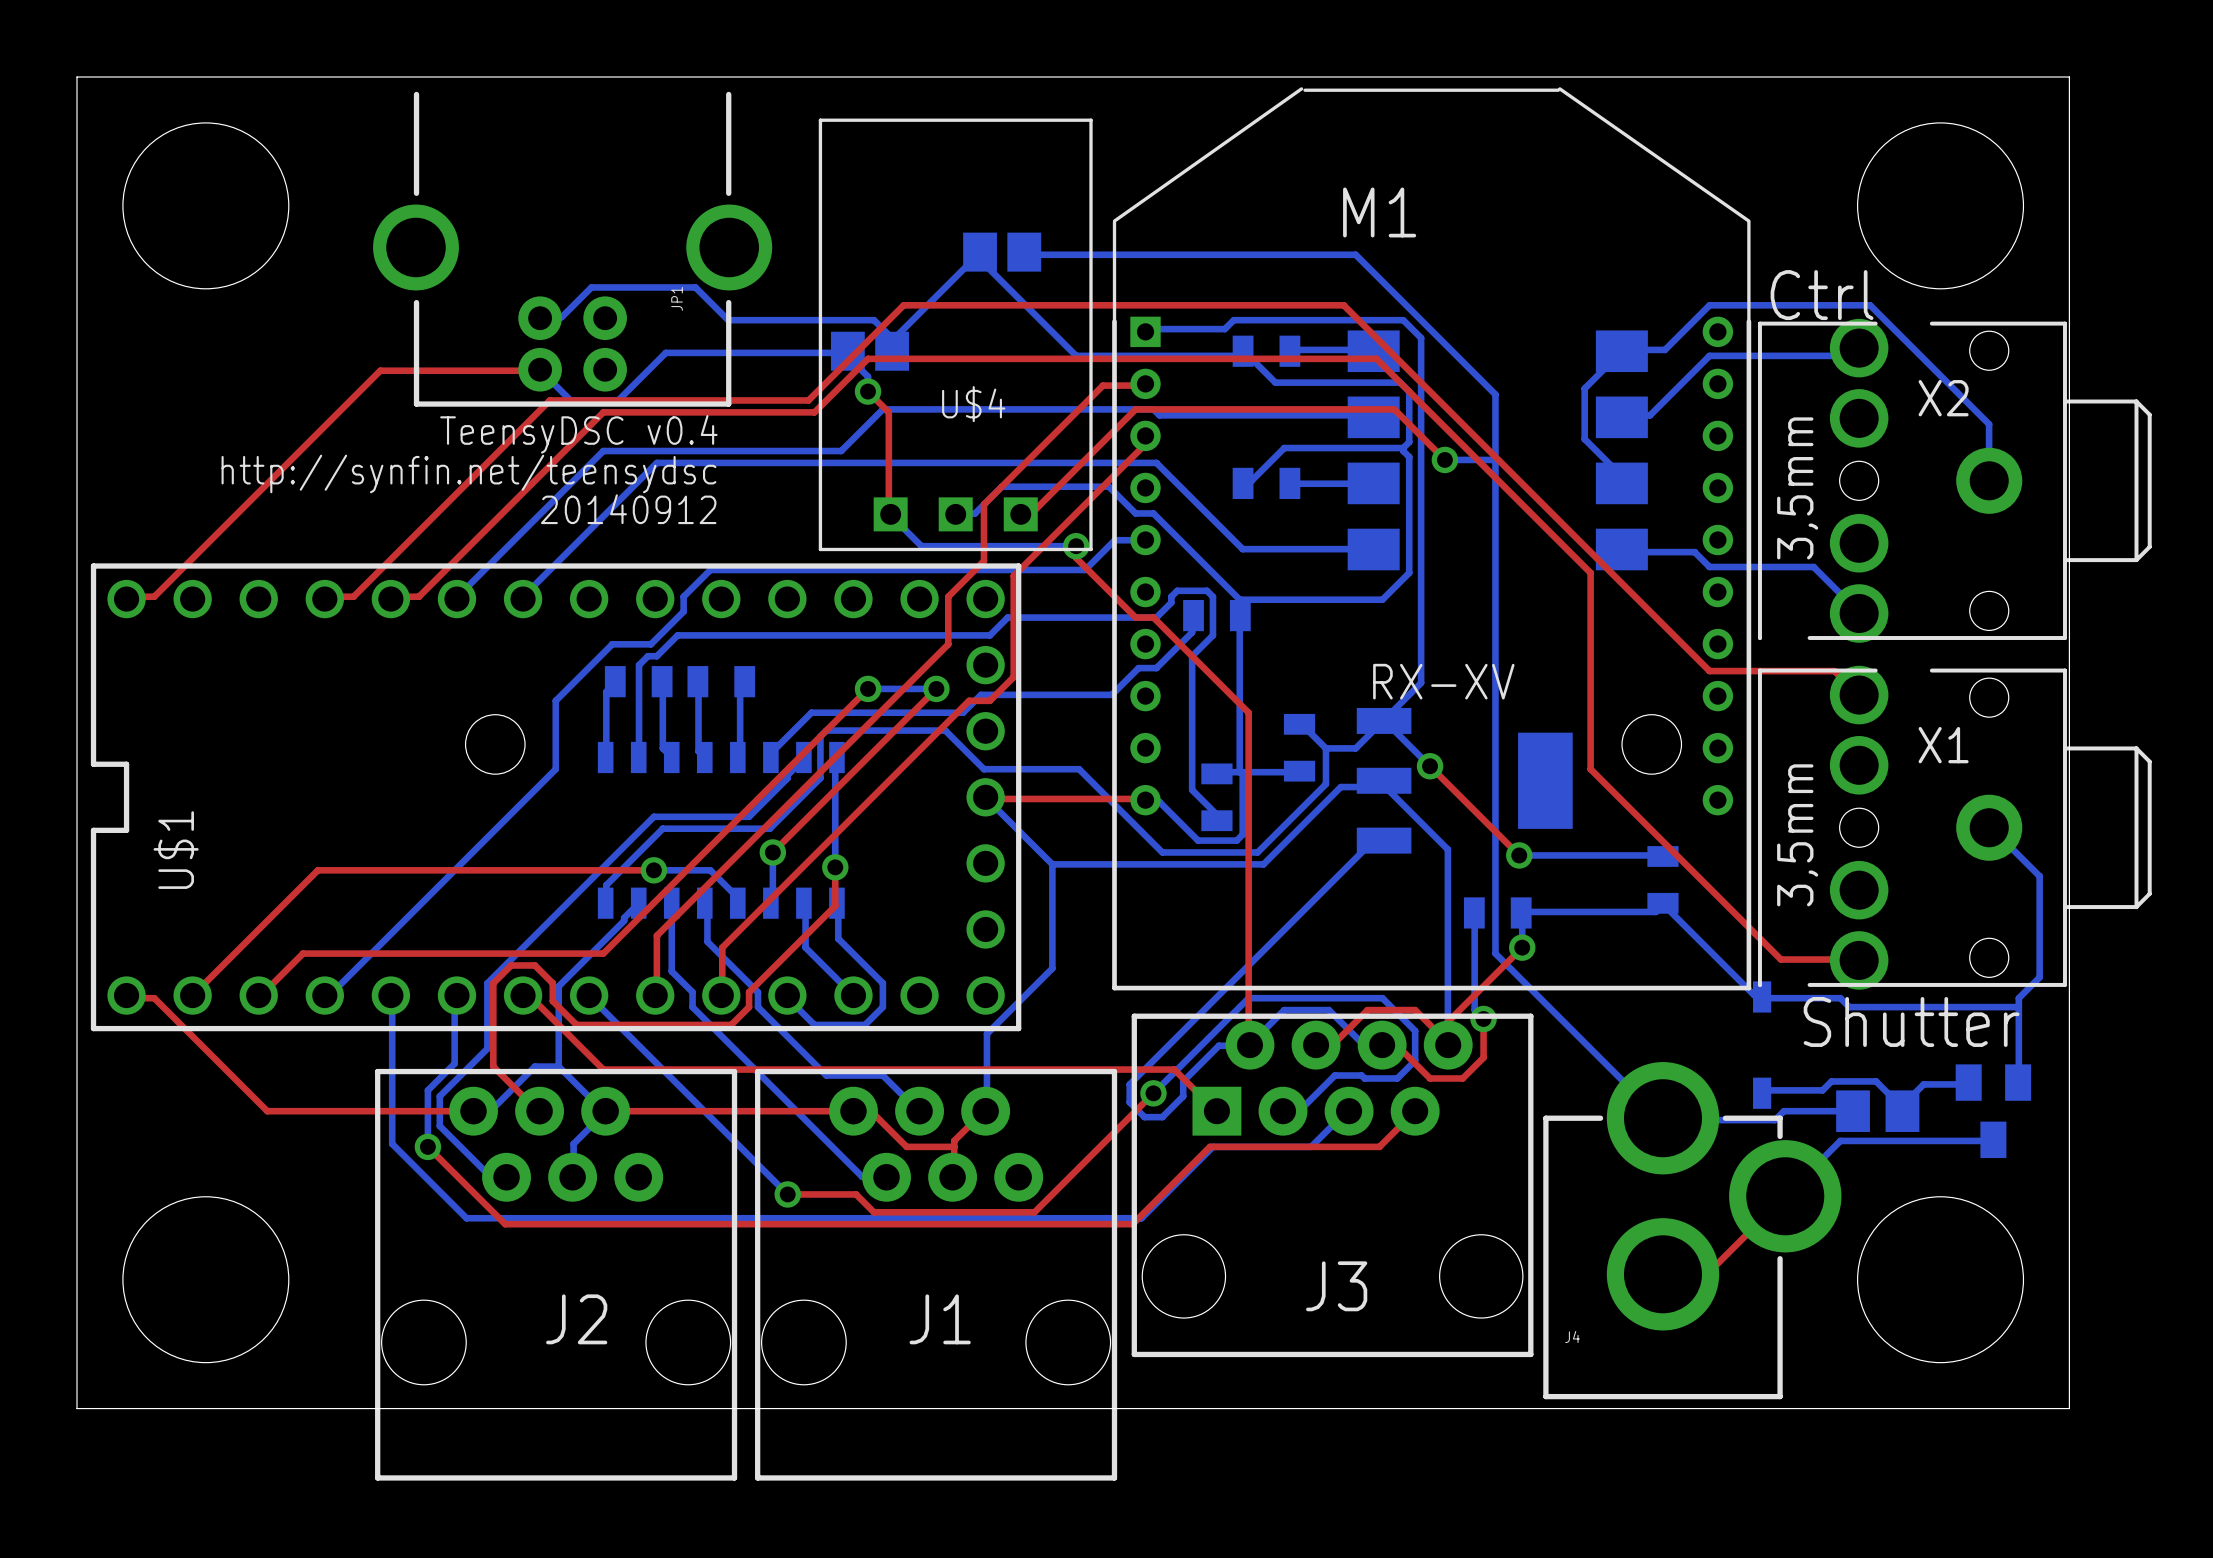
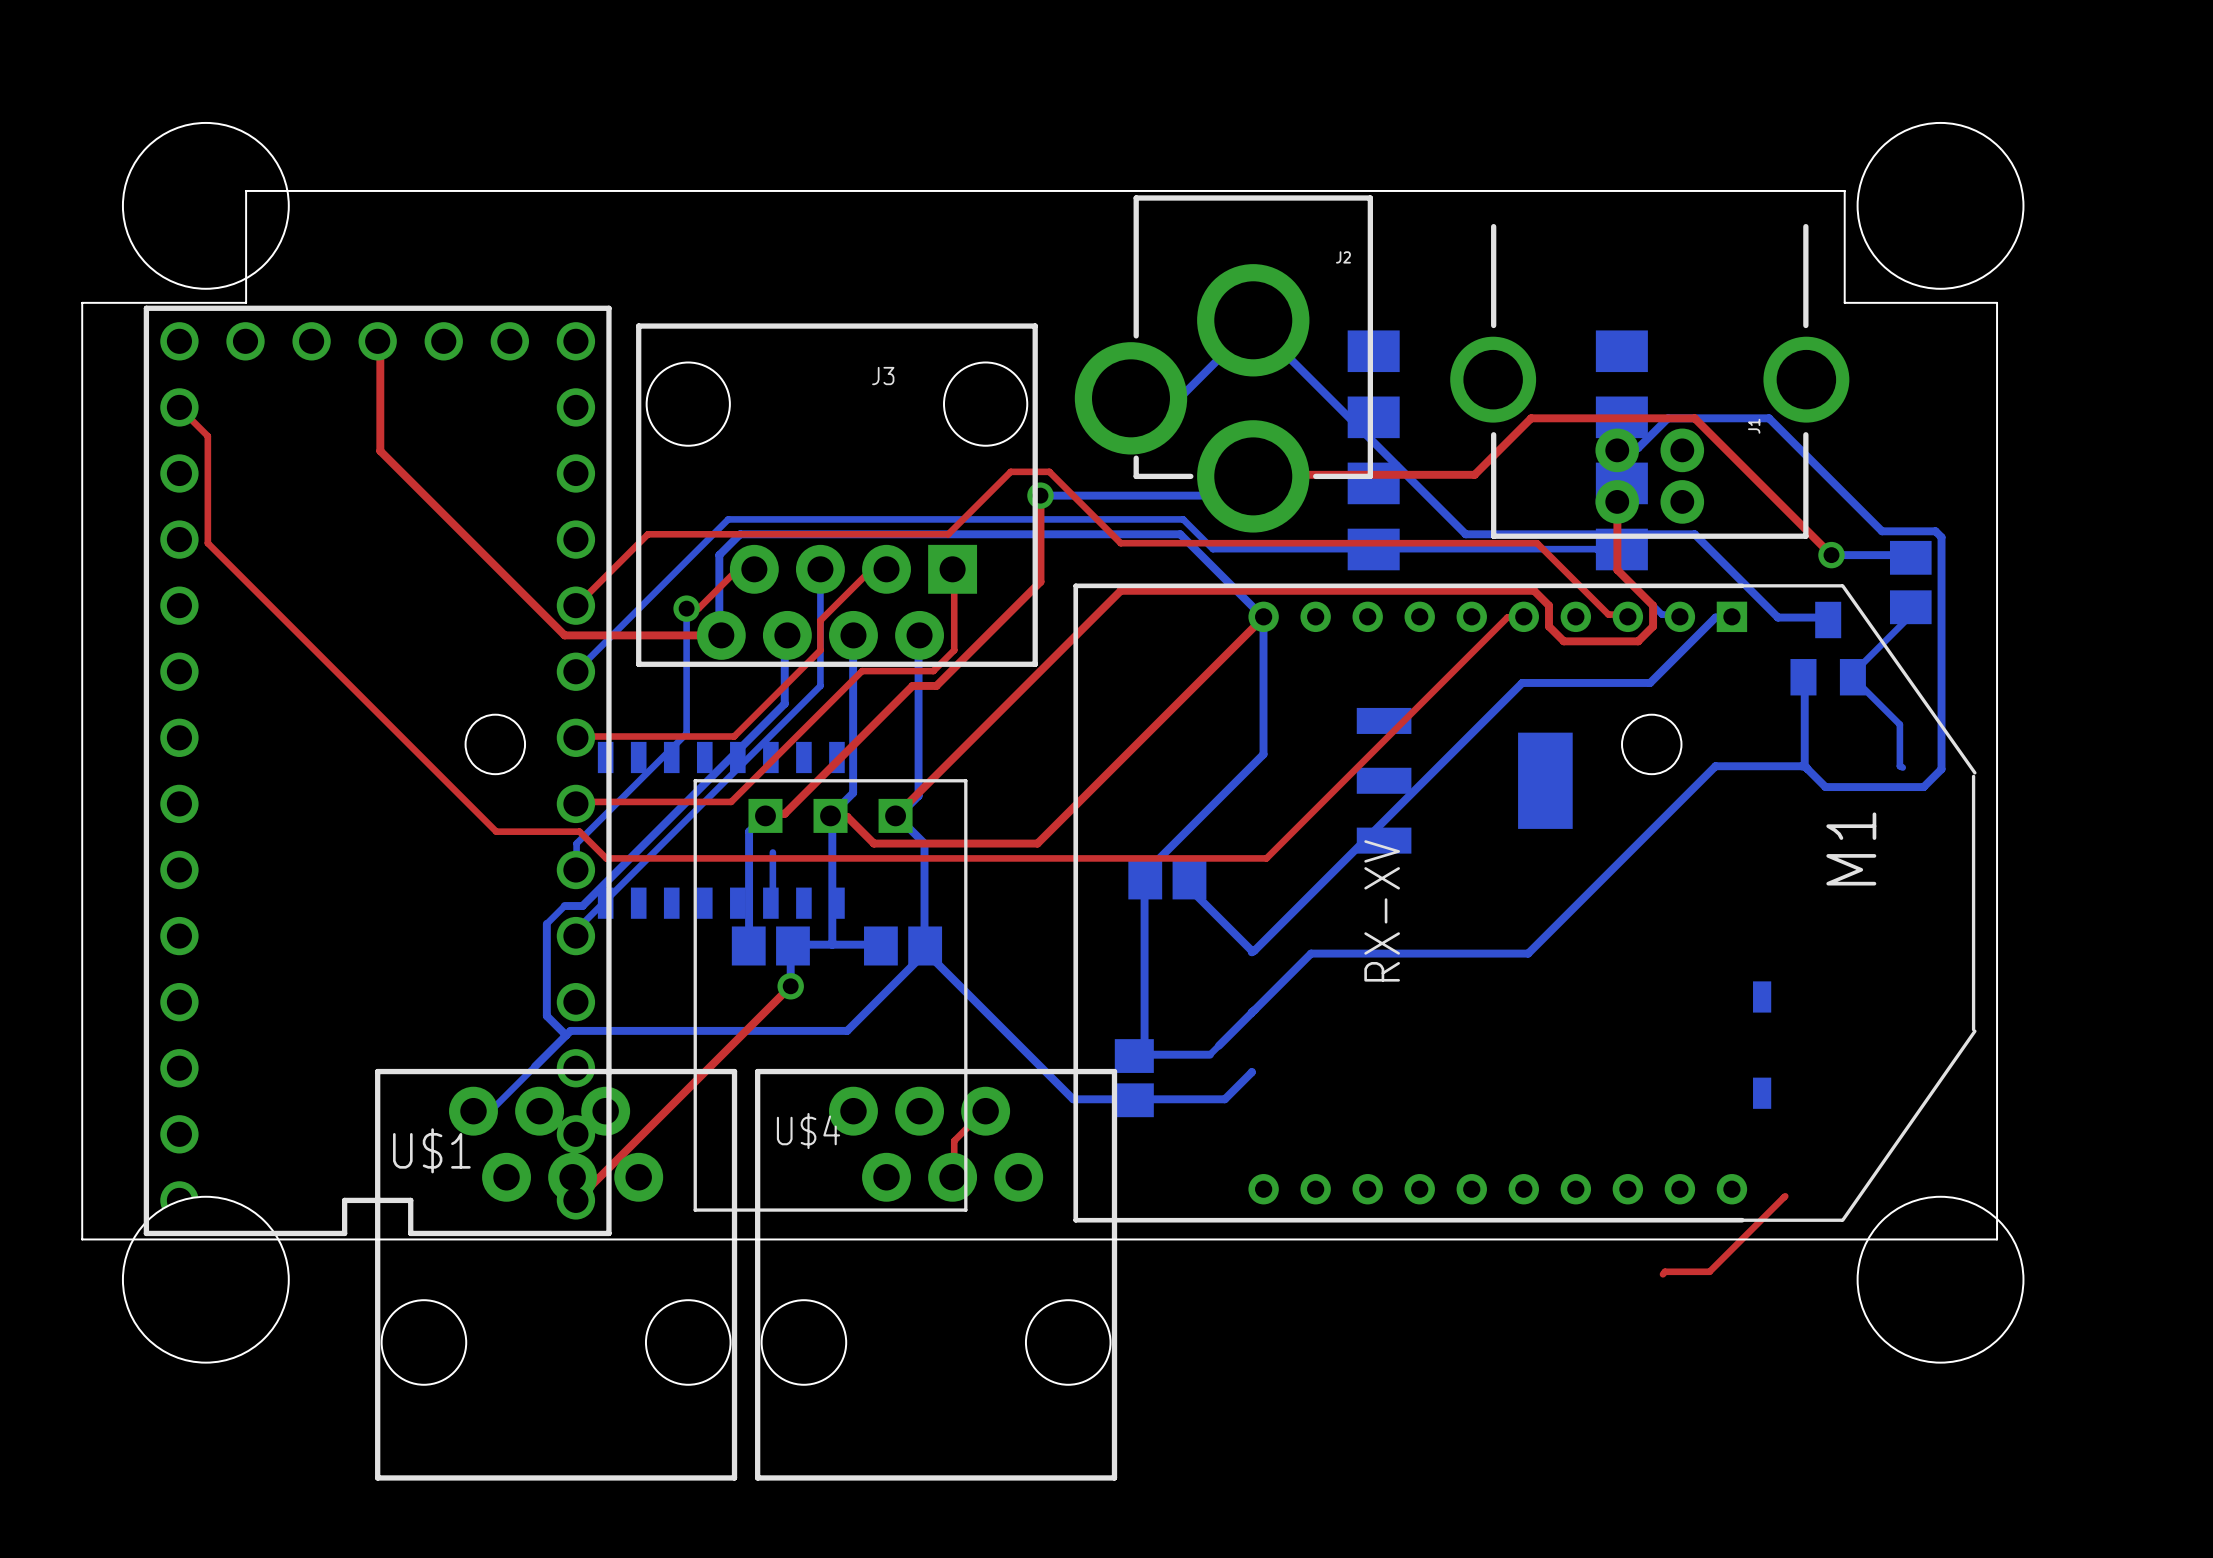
board edge: (77, 77) (2069, 77) (2069, 1408) (77, 1408) (77, 77) -> (246, 190) (246, 302) (82, 302) (82, 1239) (1997, 1239) (1997, 302) (1844, 302) (1844, 190) (246, 190)
M1 footprint: [1112, 87, 1752, 991] -> [1073, 583, 1977, 1223]
M1 name position: M1 (1379, 212) -> M1 (1851, 848)
JP1: (572, 249) -> none
part: (1002, 252) -> none
bottom track: (1024, 252) (1025, 254) (1355, 254) (1495, 394) (1495, 953) (1661, 1120) (1662, 1118) (1664, 1120) (1774, 1120) (1783, 1111) (1853, 1111) -> none
text: Ctrl (1822, 295) -> none
bottom track: (540, 318) (561, 317) (591, 287) (695, 287) (728, 320) (873, 320) (891, 338) (892, 351) (894, 349) (894, 338) (980, 252) (978, 257) (1076, 355) (1245, 355) (1243, 351) (1275, 382) (1400, 382) (1409, 391) (1409, 442) (1403, 448) -> none
bottom track: (1145, 331) (1147, 329) (1224, 329) (1233, 320) (1403, 320) (1421, 338) (1421, 682) (1384, 720) -> none
part: (955, 334) -> none
top track: none -> (377, 341) (380, 343) (380, 451) (564, 635) (721, 635)
bottom track: (1859, 348) (1852, 355) (1709, 355) (1650, 415) (1623, 415) (1621, 417) -> none
part: (869, 351) -> none
part: (1266, 351) -> none
bottom track: (1289, 351) (1373, 351) -> none
J2: none -> (1223, 363)
top track: (540, 369) (380, 370) (154, 596) (127, 596) (126, 599) -> none
bottom track: (540, 369) (570, 400) (618, 400) (665, 352) (847, 352) (847, 351) (847, 355) (868, 376) (868, 391) -> none
text: none -> J3 (883, 376)
J1: none -> (1649, 381)
top track: (1145, 383) (1144, 385) (1102, 385) (983, 504) (983, 561) (948, 596) (948, 644) (656, 935) (656, 995) (655, 995) -> none
top track: (868, 391) (888, 412) (888, 513) (890, 514) -> none
via: (868, 391) -> none
bottom track: none -> (1130, 398) (1180, 397) (1251, 326) (1253, 320) (1465, 534) (1694, 534) (1777, 617) (1825, 617) (1828, 620)
text: U$4 (973, 404) -> none
top track: none -> (179, 407) (207, 436) (207, 543) (496, 831) (579, 831) (606, 858) (1266, 858) (1507, 617) (1523, 616)
bottom track: (1373, 417) (1373, 415) (1159, 415) (1153, 409) (882, 409) (841, 451) (603, 451) (456, 599) -> none
text: TeensyDSC v0.4 (578, 434) -> none
top track: (1145, 435) (1144, 445) (1013, 575) (1013, 677) (989, 700) (969, 700) (722, 947) (721, 995) -> none
bottom track: (1403, 448) (1284, 448) (1251, 480) (1245, 480) (1243, 483) -> none
bottom track: (1403, 448) (1403, 451) (1409, 456) (1409, 572) (1382, 599) (1239, 599) -> none
bottom track: none -> (1617, 450) (1617, 448) (1638, 448) (1667, 418) (1769, 418) (1882, 531) (1935, 531) (1941, 537) (1941, 769) (1923, 787) (1825, 787) (1806, 767)
top track: (1444, 459) (1394, 409) (1135, 409) (1031, 513) (1020, 514) -> none
bottom track: (1444, 459) (1495, 459) -> none
via: (1444, 459) -> none
text: http://synfin.net/teensydsc (468, 473) -> none
top track: none -> (1253, 476) (1254, 474) (1474, 474) (1531, 418) (1694, 418) (1831, 555)
bottom track: none -> (1253, 476) (1233, 495) (1040, 495)
X2: (1954, 480) -> none
bottom track: (1989, 480) (1989, 424) (1870, 305) (1709, 305) (1664, 349) (1623, 349) (1584, 388) (1584, 439) (1620, 474) (1621, 483) -> none
part: (1266, 483) -> none
bottom track: (1290, 483) (1373, 483) -> none
part: none -> (836, 495)
top track: none -> (1040, 495) (1040, 581) (936, 685) (912, 685) (784, 813) (766, 813) (765, 815)
top track: none -> (1617, 501) (1617, 569) (1653, 605) (1653, 626) (1638, 641) (1563, 641) (1548, 626) (1548, 605) (1534, 590) (1120, 590) (895, 815)
text: 20140912 (628, 509) -> none
bottom track: (890, 514) (921, 546) (1076, 546) -> none
bottom track: (955, 514) (975, 513) (1001, 486) (1108, 486) (1135, 513) (1153, 513) (1239, 599) -> none
bottom track: (1145, 539) (1114, 540) (1085, 569) (710, 569) (683, 596) (683, 611) (650, 644) (612, 644) (555, 700) (555, 769) (326, 998) (324, 995) -> none
top track: (1076, 546) (1076, 558) (1135, 617) (1153, 617) (1248, 712) (1249, 1045) -> none
via position: (1076, 546) -> (1040, 495)
bottom track: (1242, 549) (1156, 462) (656, 462) (523, 596) (523, 599) -> (1242, 549) (1212, 549) (1183, 519) (728, 519) (575, 671)
bottom track: none -> (1373, 549) (1596, 549) (1661, 614) (1679, 614) (1679, 616)
bottom track: (1621, 549) (1623, 552) (1694, 552) (1709, 567) (1813, 567) (1859, 613) -> none
bottom track: none -> (1831, 555) (1908, 555) (1910, 557)
via: none -> (1831, 555)
top track: none -> (754, 569) (737, 569) (698, 608) (686, 608)
bottom track: none -> (820, 569) (820, 685) (576, 929) (575, 936)
top track: none -> (886, 569) (870, 569) (820, 620) (820, 650) (734, 736) (575, 737)
top track: none -> (952, 569) (954, 569) (954, 650) (933, 671) (862, 671) (731, 801) (576, 801) (575, 803)
top track: (324, 599) (326, 596) (353, 596) (549, 400) (808, 400) (903, 305) (1343, 305) (1709, 671) (1834, 671) (1859, 695) -> none
top track: (390, 599) (392, 596) (418, 596) (603, 412) (814, 412) (868, 358) (1376, 358) (1590, 572) (1590, 769) (1780, 959) (1859, 960) -> none
bottom track: (1239, 599) (1239, 772) -> none
top track: none -> (575, 605) (647, 534) (948, 534) (1010, 471) (1049, 471) (1120, 543) (1537, 543) (1608, 614) (1626, 614) (1627, 616)
bottom track: none -> (1910, 607) (1908, 608) (1908, 617) (1852, 674) (1855, 680) (1899, 724) (1899, 766) (1902, 767)
bottom track: none -> (686, 608) (686, 733) (576, 843) (575, 869)
via: none -> (686, 608)
bottom track: (1193, 615) (1192, 632) (1156, 668) (1138, 668) (1111, 694) (981, 694) (963, 712) (811, 712) (772, 751) (772, 757) (770, 757) -> none
part: (1216, 615) -> none
top track: none -> (1263, 616) (1037, 843) (873, 843) (847, 816) (830, 815)
bottom track: none -> (1731, 616) (1715, 617) (1650, 682) (1522, 682) (1251, 952) (1192, 891) (1192, 882) (1189, 879)
bottom track: (719, 635) (677, 635) (656, 656) (647, 656) (639, 665) (639, 757) -> (719, 635) (719, 555) (740, 534) (1180, 534) (1263, 616) (1263, 754) (1144, 873) (1144, 1051) (1134, 1056) (1209, 1054)
bottom track: (721, 635) (784, 635) -> none
bottom track: (787, 635) (918, 635) -> none
bottom track: none -> (853, 635) (853, 793) (830, 815) (832, 816) (832, 944)
bottom track: (919, 635) (989, 635) (1007, 617) (1156, 617) (1171, 602) (1171, 596) (1177, 590) (1207, 590) (1212, 596) (1212, 635) (1192, 656) (1192, 790) (1215, 813) (1216, 820) -> (919, 635) (918, 795) (900, 813) (895, 815) (924, 843) (925, 945)
bottom track: none -> (1803, 677) (1804, 766) (1806, 767)
bottom track: (615, 681) (606, 691) (605, 757) -> none
part: (638, 681) -> none
bottom track: (662, 681) (662, 748) (671, 757) -> none
bottom track: (697, 681) (698, 751) (704, 757) -> none
part: (721, 681) -> none
bottom track: (744, 681) (740, 685) (740, 757) (737, 757) -> none
top track: (868, 688) (603, 953) (303, 953) (261, 995) (258, 995) -> none
bottom track: (868, 688) (936, 688) -> none
via: (868, 688) -> none
top track: (936, 688) (772, 852) -> none
via: (936, 688) -> none
bottom track: (1384, 720) (1430, 766) -> none
bottom track: (1384, 720) (1355, 748) (1325, 748) -> none
bottom track: (1299, 724) (1302, 724) (1325, 748) -> none
part: (1299, 747) -> none
bottom track: (1325, 748) (1325, 784) (1257, 852) (1162, 852) (1079, 769) (983, 769) (945, 730) (826, 730) (820, 736) (820, 778) (769, 828) (662, 828) (606, 885) (605, 903) -> none
bottom track: (803, 757) (787, 775) (787, 778) (749, 816) (653, 816) (564, 906) -> (784, 635) (784, 703) (582, 906) (564, 906)
bottom track: (836, 757) (835, 760) (835, 867) -> none
top track: (1430, 766) (1519, 855) -> none
via: (1430, 766) -> none
bottom track: (1299, 771) (1218, 772) (1216, 773) -> none
bottom track: (1242, 772) (1242, 834) (1236, 840) (1198, 840) (1159, 801) (1145, 800) -> none
U$1 rotation: 0° (556, 797) -> 90° counterclockwise (377, 770)
top track: (985, 797) (986, 798) (1145, 800) -> none
bottom track: (985, 797) (1052, 864) -> none
part: (1216, 797) -> none
bottom track: none -> (765, 815) (749, 831) (748, 945)
X1: (1954, 827) -> none
bottom track: (1989, 827) (2039, 876) (2039, 977) (2018, 998) (2018, 1082) -> none
bottom track: (1384, 840) (1382, 843) (1370, 843) (1129, 1084) (1129, 1102) (1144, 1117) (1162, 1117) (1183, 1096) (1183, 1081) (1209, 1054) -> none
via: (772, 852) -> none
bottom track: (1519, 855) (1662, 856) -> none
via: (1519, 855) -> none
bottom track: (1052, 864) (1263, 864) (1340, 787) (1382, 787) (1385, 781) (1385, 787) (1447, 849) (1448, 1045) -> none
bottom track: (1052, 864) (1052, 968) (986, 1033) (985, 1111) -> none
top track: (835, 867) (835, 906) (749, 992) (749, 1007) (731, 1024) (576, 1024) (552, 1001) (552, 983) (534, 965) (511, 965) (493, 983) (493, 1066) (539, 1111) -> none
via: (835, 867) -> none
top track: (653, 870) (317, 870) (192, 995) -> none
bottom track: (653, 870) (710, 870) (737, 897) (737, 903) -> none
via: (653, 870) -> none
part: none -> (1167, 879)
part: (1662, 879) -> none
bottom track: (638, 903) (624, 917) (624, 920) (558, 986) (558, 1066) -> none
bottom track: (671, 903) (671, 971) (692, 992) (692, 1007) (862, 1176) (886, 1177) -> none
bottom track: (704, 903) (707, 906) (707, 941) (757, 992) (757, 1007) (826, 1075) (882, 1075) (919, 1111) -> none
bottom track: (803, 903) (805, 906) (805, 947) (853, 995) -> none
bottom track: (836, 903) (838, 938) (882, 983) (882, 1007) (865, 1024) (814, 1024) (787, 998) (787, 995) -> none
bottom track: (1474, 912) (1474, 1010) (1483, 1019) -> none
part: (1497, 912) -> none
bottom track: (546, 923) (487, 983) (487, 1048) (439, 1096) (439, 1126) (490, 1176) (506, 1177) -> (546, 923) (546, 1016) (566, 1035)
part: none -> (770, 945)
bottom track: none -> (880, 945) (793, 944) (790, 947) (790, 986)
part: none -> (903, 945)
bottom track: none -> (925, 945) (927, 953) (1073, 1099) (1224, 1099) (1251, 1071)
top track: (1522, 947) (1438, 1030) (1448, 1045) (1415, 1010) (1367, 1010) (1334, 1042) (1317, 1042) (1316, 1045) -> none
bottom track: (1522, 947) (1522, 911) (1656, 911) (1662, 903) (1754, 995) (1760, 995) (1763, 998) (1840, 998) (1849, 1007) (2018, 1007) -> none
via: (1522, 947) -> none
top track: none -> (790, 986) (575, 1200)
via: none -> (790, 986)
top track: (126, 995) (127, 998) (154, 998) (267, 1111) (473, 1111) -> none
bottom track: (390, 995) (392, 1143) (466, 1218) (1141, 1218) (1212, 1146) (1311, 1146) (1346, 1111) (1349, 1111) -> none
bottom track: (456, 995) (454, 998) (454, 1063) (427, 1090) (427, 1146) -> none
top track: (523, 995) (523, 998) (531, 998) (603, 1069) (1174, 1069) (1216, 1111) -> none
bottom track: (589, 995) (787, 1194) -> none
part: none -> (830, 995)
top track: (1483, 1019) (1483, 1057) (1462, 1078) (1430, 1078) (1397, 1045) (1382, 1045) -> none
via: (1483, 1019) -> none
text: Shutter (1911, 1021) -> none
bottom track: (1382, 1045) (1379, 1042) (1361, 1042) (1328, 1010) (1284, 1010) (1249, 1045) (1218, 1045) -> (1806, 767) (1715, 766) (1528, 953) (1311, 953) (1218, 1045)
bottom track: (534, 1066) (558, 1066) -> (534, 1066) (570, 1030) (847, 1030) (924, 953) (925, 945)
bottom track: (558, 1066) (603, 1111) (605, 1111) (573, 1143) (572, 1177) -> none
part: none -> (1134, 1078)
bottom track: (1968, 1082) (1968, 1084) (1923, 1084) (1902, 1105) (1902, 1111) (1899, 1111) (1899, 1105) (1876, 1081) (1831, 1081) (1822, 1090) (1763, 1090) (1762, 1093) -> none
top track: (1153, 1093) (1034, 1212) (873, 1212) (856, 1194) (787, 1194) -> none
bottom track: (1153, 1093) (1248, 998) (1382, 998) (1415, 1030) (1415, 1060) (1397, 1078) (1364, 1078) (1361, 1075) (1334, 1075) (1299, 1111) (1283, 1111) -> none
via: (1153, 1093) -> none
top track: (605, 1111) (870, 1111) (906, 1146) (954, 1146) -> none
top track: (1415, 1111) (1379, 1146) (1209, 1146) (1132, 1224) (505, 1224) (427, 1146) -> none
part rotation: 0° (1877, 1111) -> 90° clockwise (1910, 582)
part position: (1877, 1111) -> (1910, 582)
part rotation: 0° (1993, 1111) -> 180° (1828, 648)
part position: (1993, 1111) -> (1828, 648)
text: none -> U$4 (808, 1131)
bottom track: (1993, 1139) (1840, 1140) (1785, 1196) -> none
via: (427, 1146) -> none
part: (1332, 1185) -> none
via: (787, 1194) -> none
J4: (1692, 1230) -> none
text: J3 (1336, 1286) -> none
text: J2 (576, 1319) -> none
text: J1 (940, 1319) -> none

